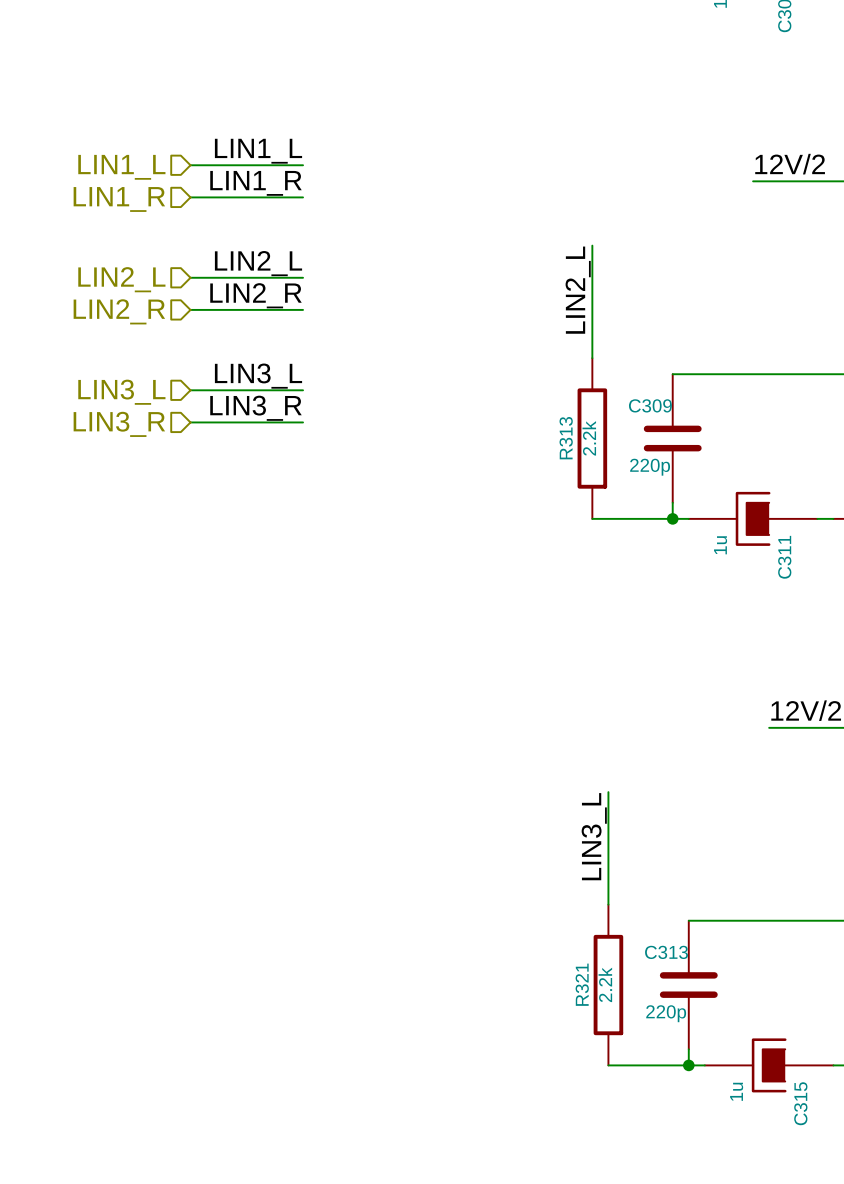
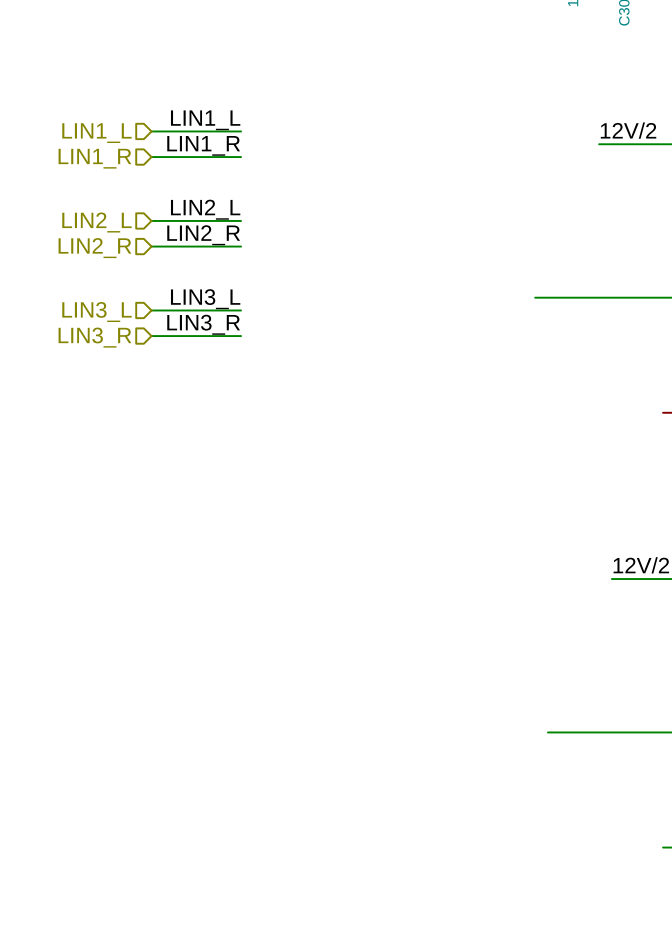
wire: (592, 245) (592, 358) -> none
label: LIN2_L (578, 290) -> none
R313: 2.2k (592, 438) -> none
C309: 220p (672, 438) -> none
wire: (672, 502) (672, 518) -> none
wire: (592, 518) (688, 518) -> none
junction: (672, 518) -> none
C311: 1u (753, 518) -> none
wire: (817, 518) (833, 518) -> none
wire: (608, 792) (608, 904) -> none
label: LIN3_L (594, 836) -> none
R321: 2.2k (608, 985) -> none
C313: 220p (688, 985) -> none
wire: (688, 1049) (688, 1065) -> none
wire: (608, 1065) (704, 1065) -> none
junction: (688, 1065) -> none
C315: 1u (769, 1065) -> none

